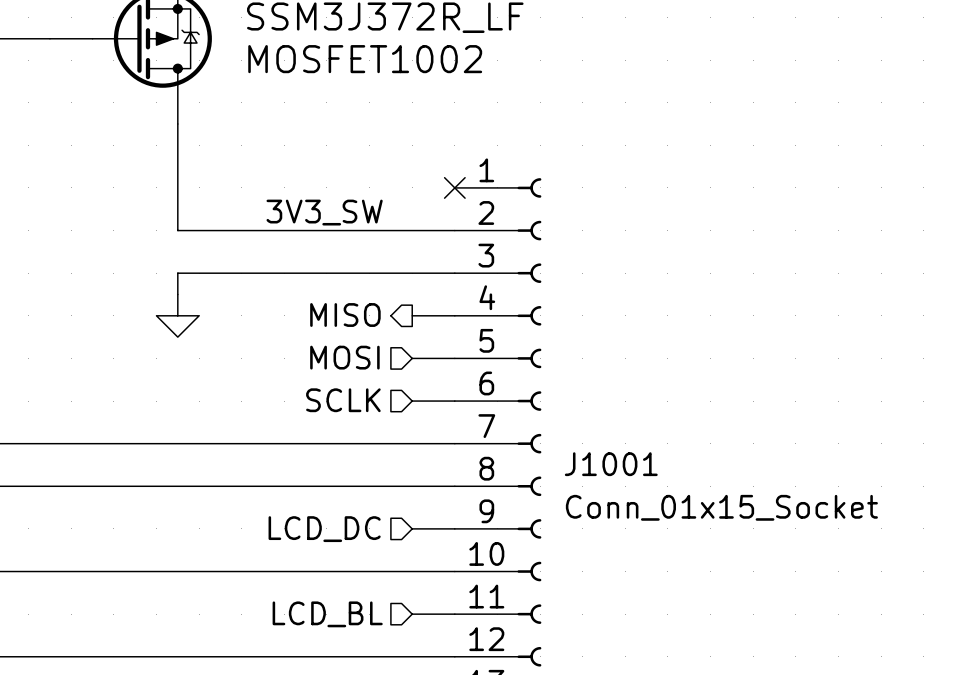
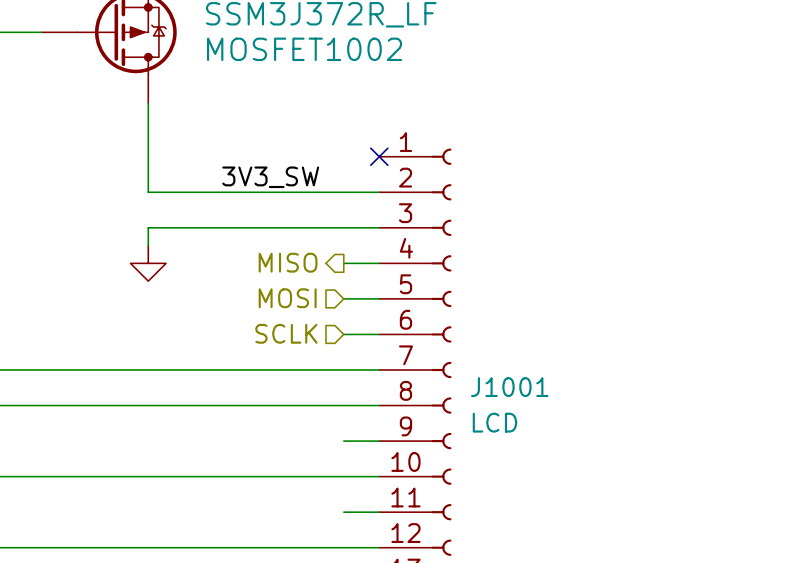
J1001 value: Conn_01x15_Socket (721, 507) -> LCD (494, 422)
hierarchical label: LCD_DC (324, 529) -> none
hierarchical label: LCD_BL (327, 614) -> none

